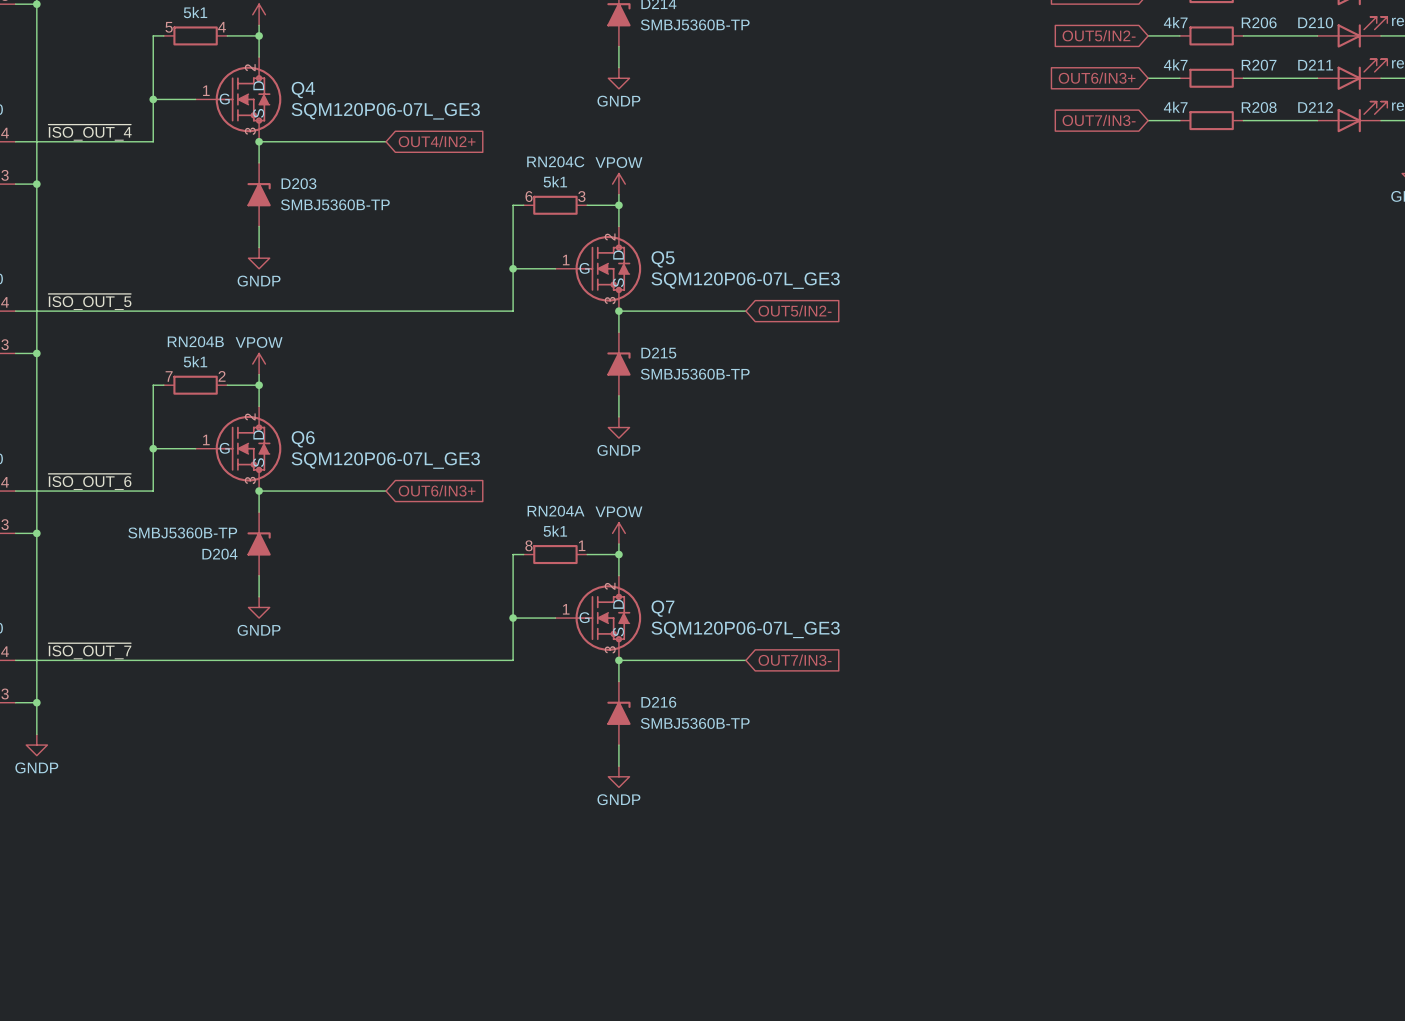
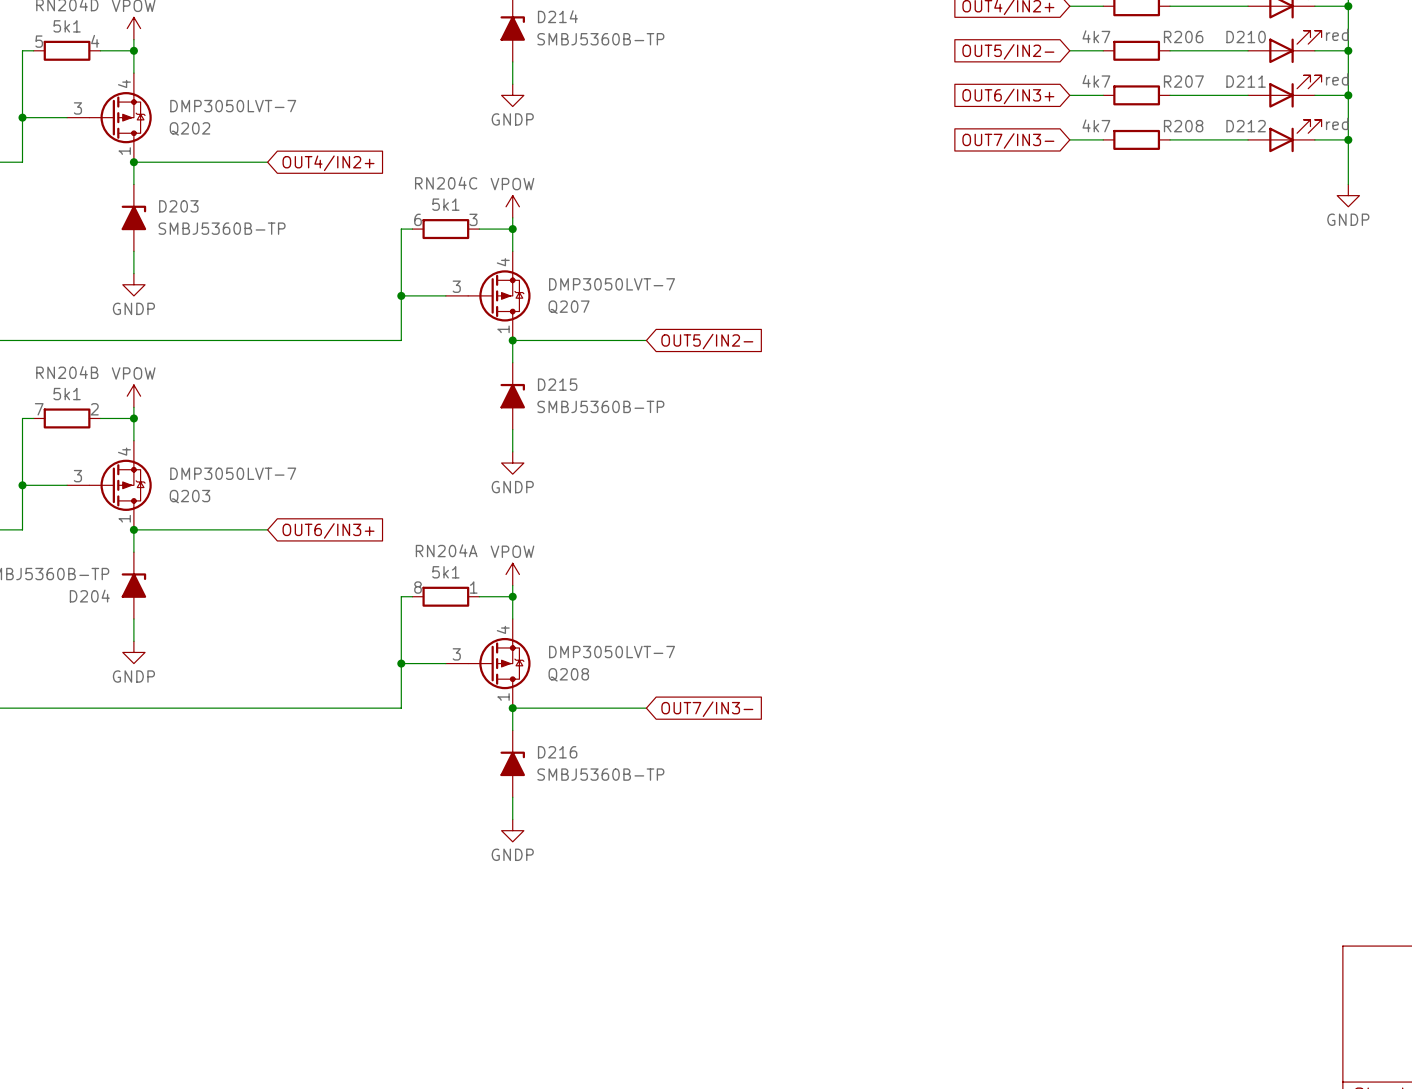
Q202: none -> DMP3050LVT-7 (109, 117)
Q4: SQM120P06-07L_GE3 (238, 99) -> none
Q207: none -> DMP3050LVT-7 (488, 295)
Q5: SQM120P06-07L_GE3 (598, 268) -> none
Q203: none -> DMP3050LVT-7 (109, 485)
Q6: SQM120P06-07L_GE3 (238, 448) -> none
Q208: none -> DMP3050LVT-7 (488, 663)
Q7: SQM120P06-07L_GE3 (598, 618) -> none

